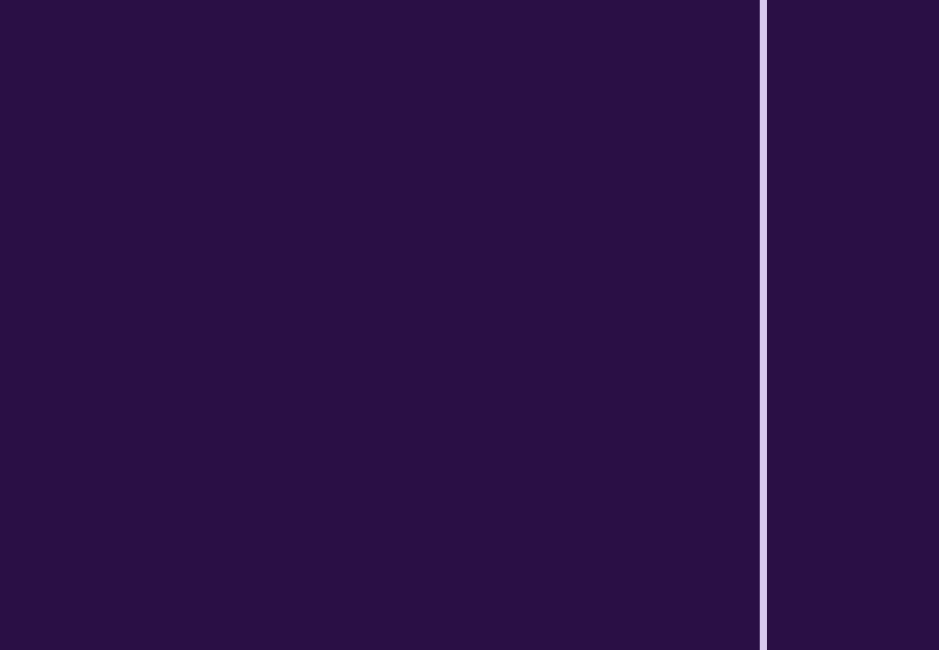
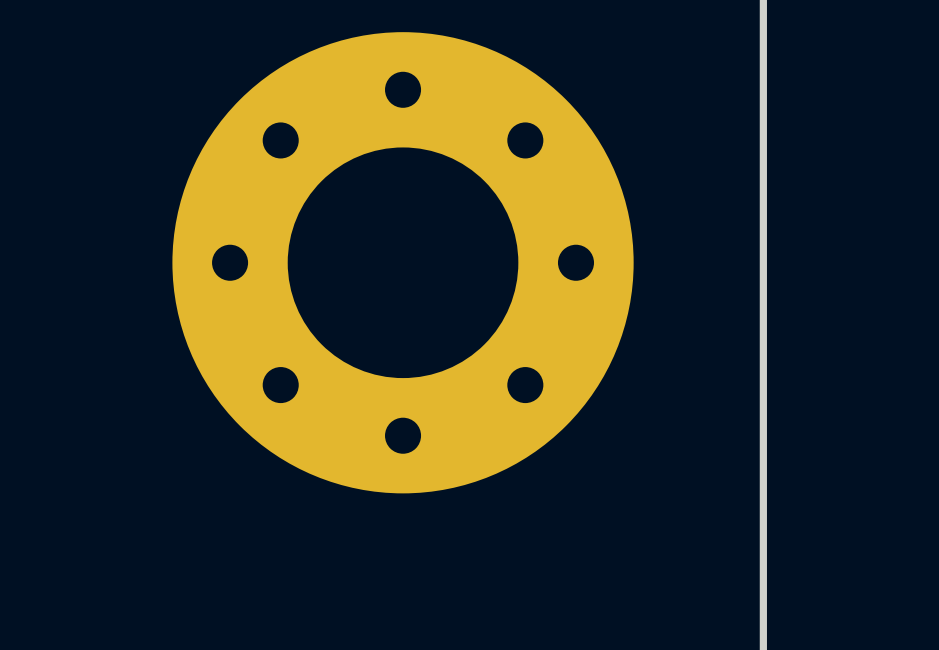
part: none -> (403, 262)

